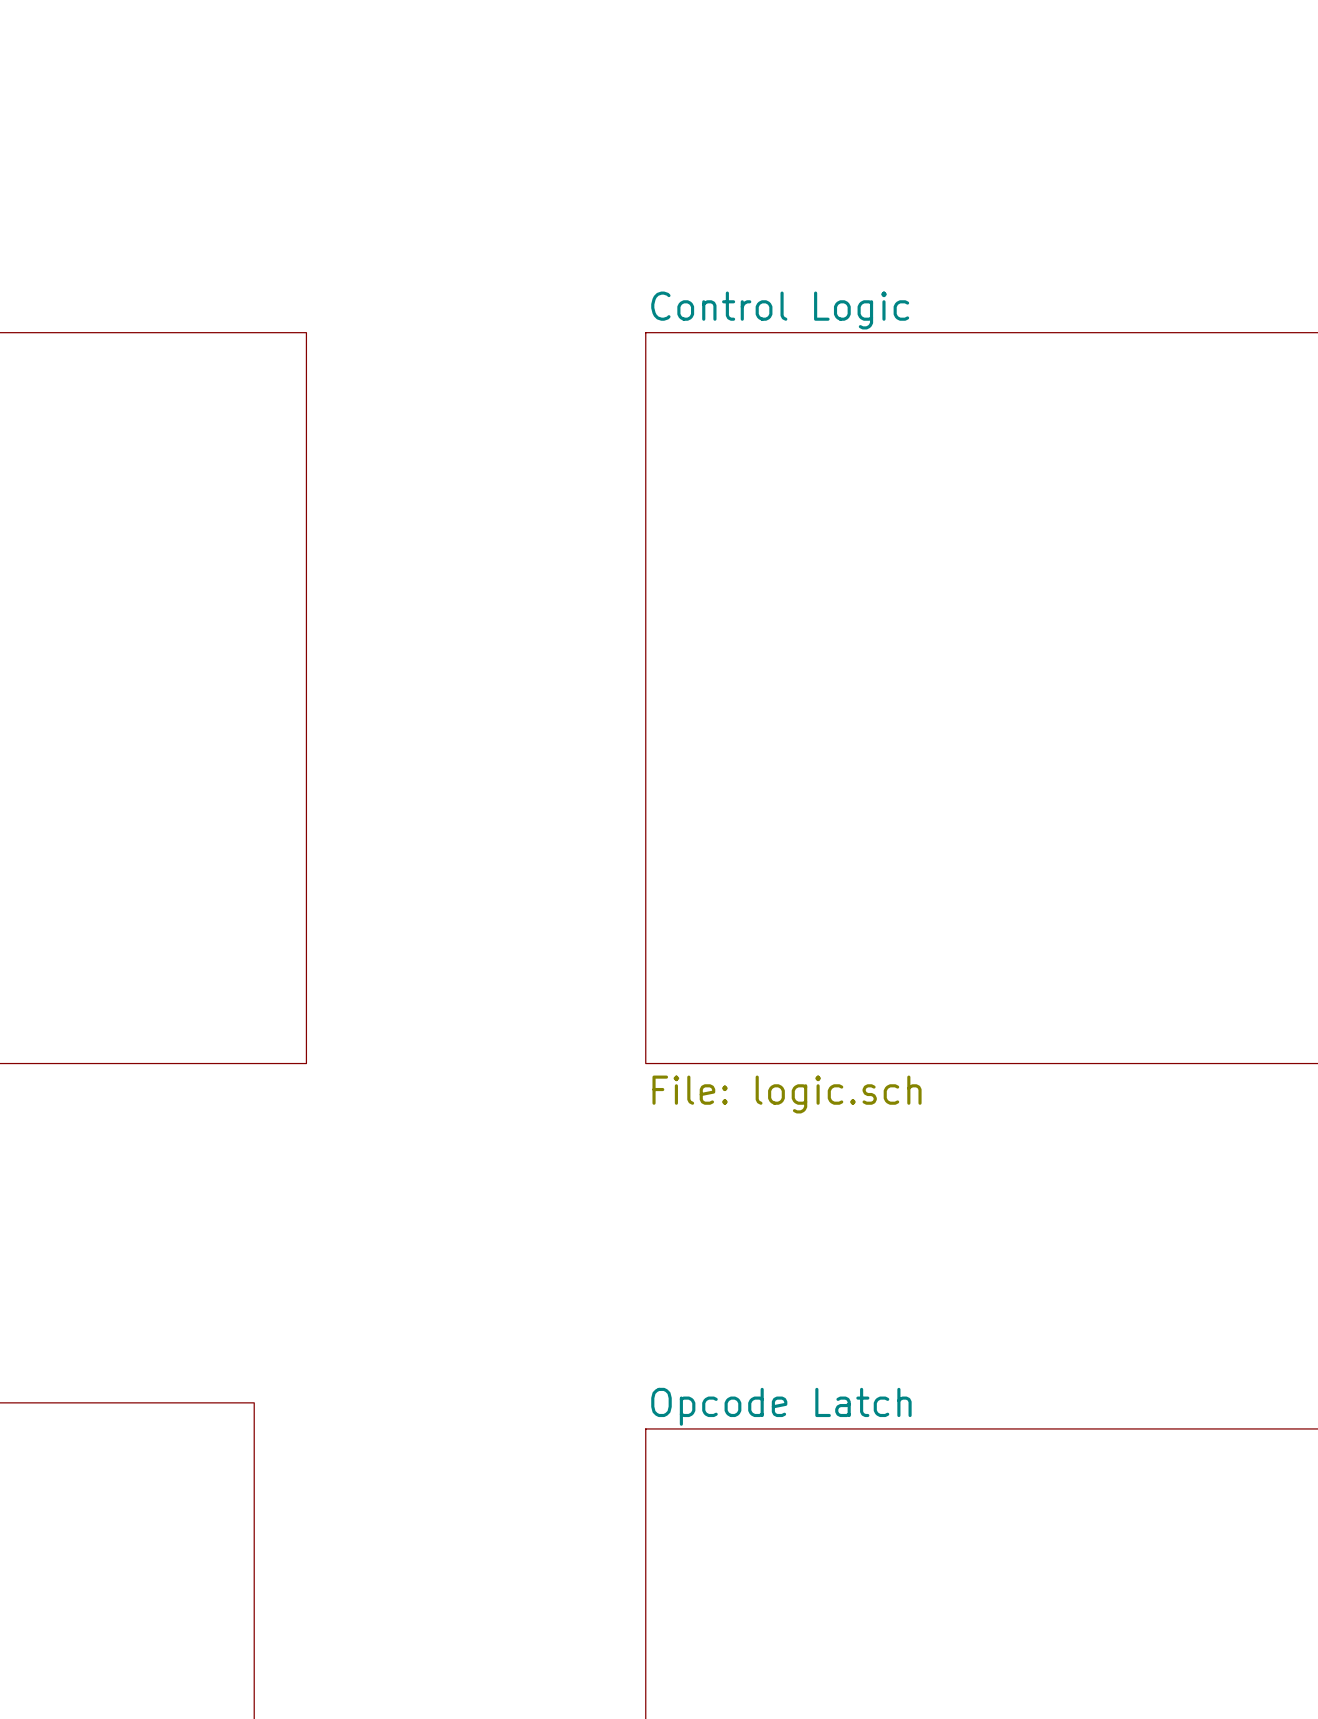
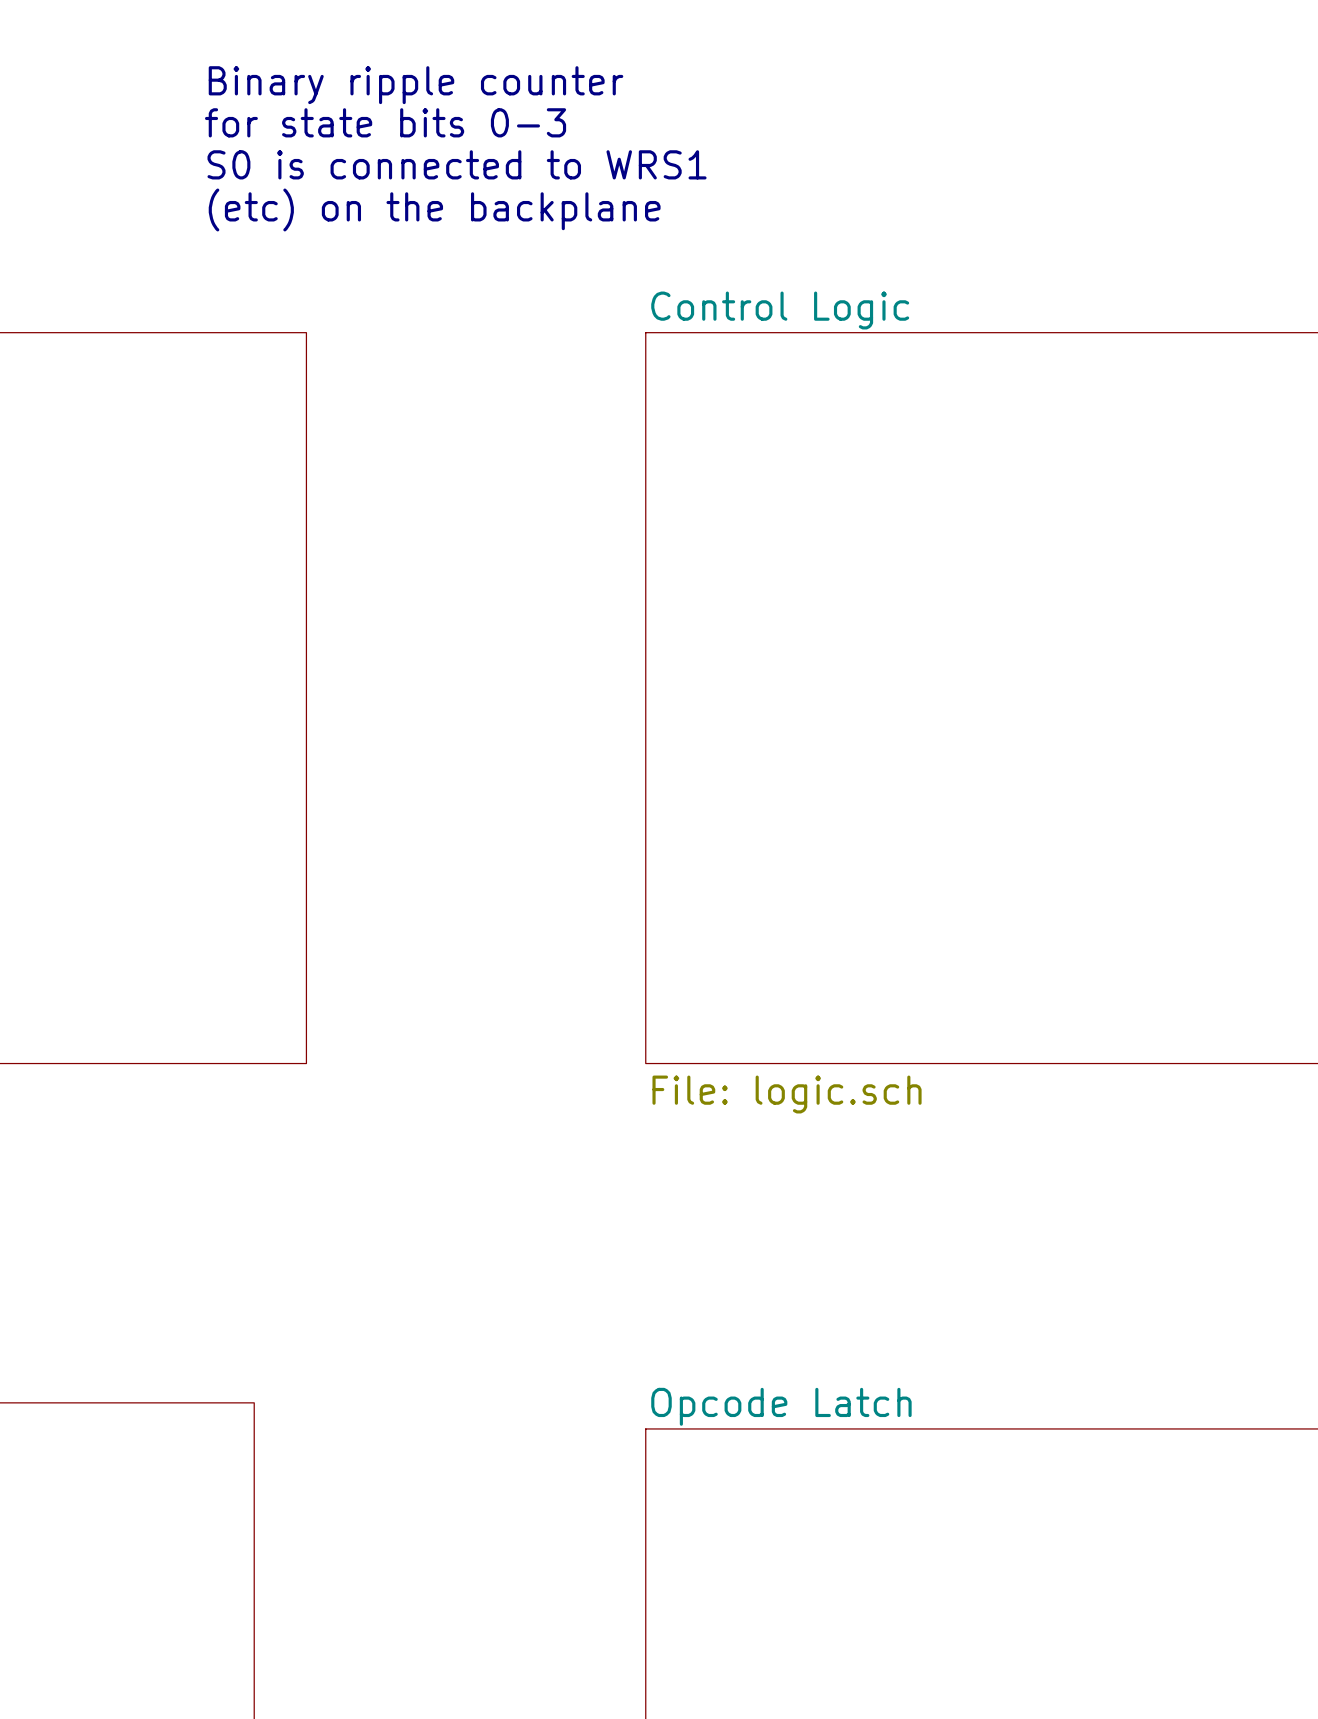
text: none -> Binary ripple counter (416, 85)
text: none -> for state bits 0-3 (385, 122)
text: none -> S0 is connected to WRS1 (457, 164)
text: none -> (etc) on the backplane (434, 209)

